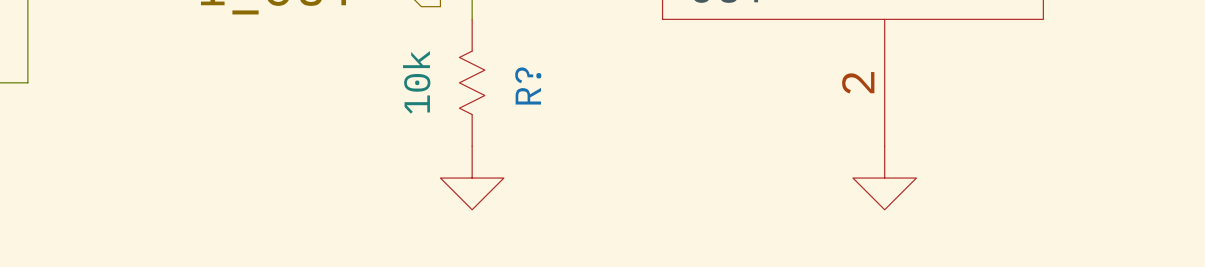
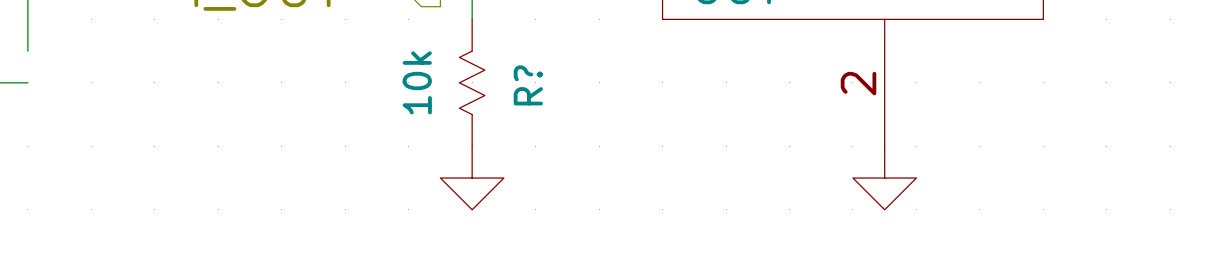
wire: (27, 51) (27, 82) -> none

